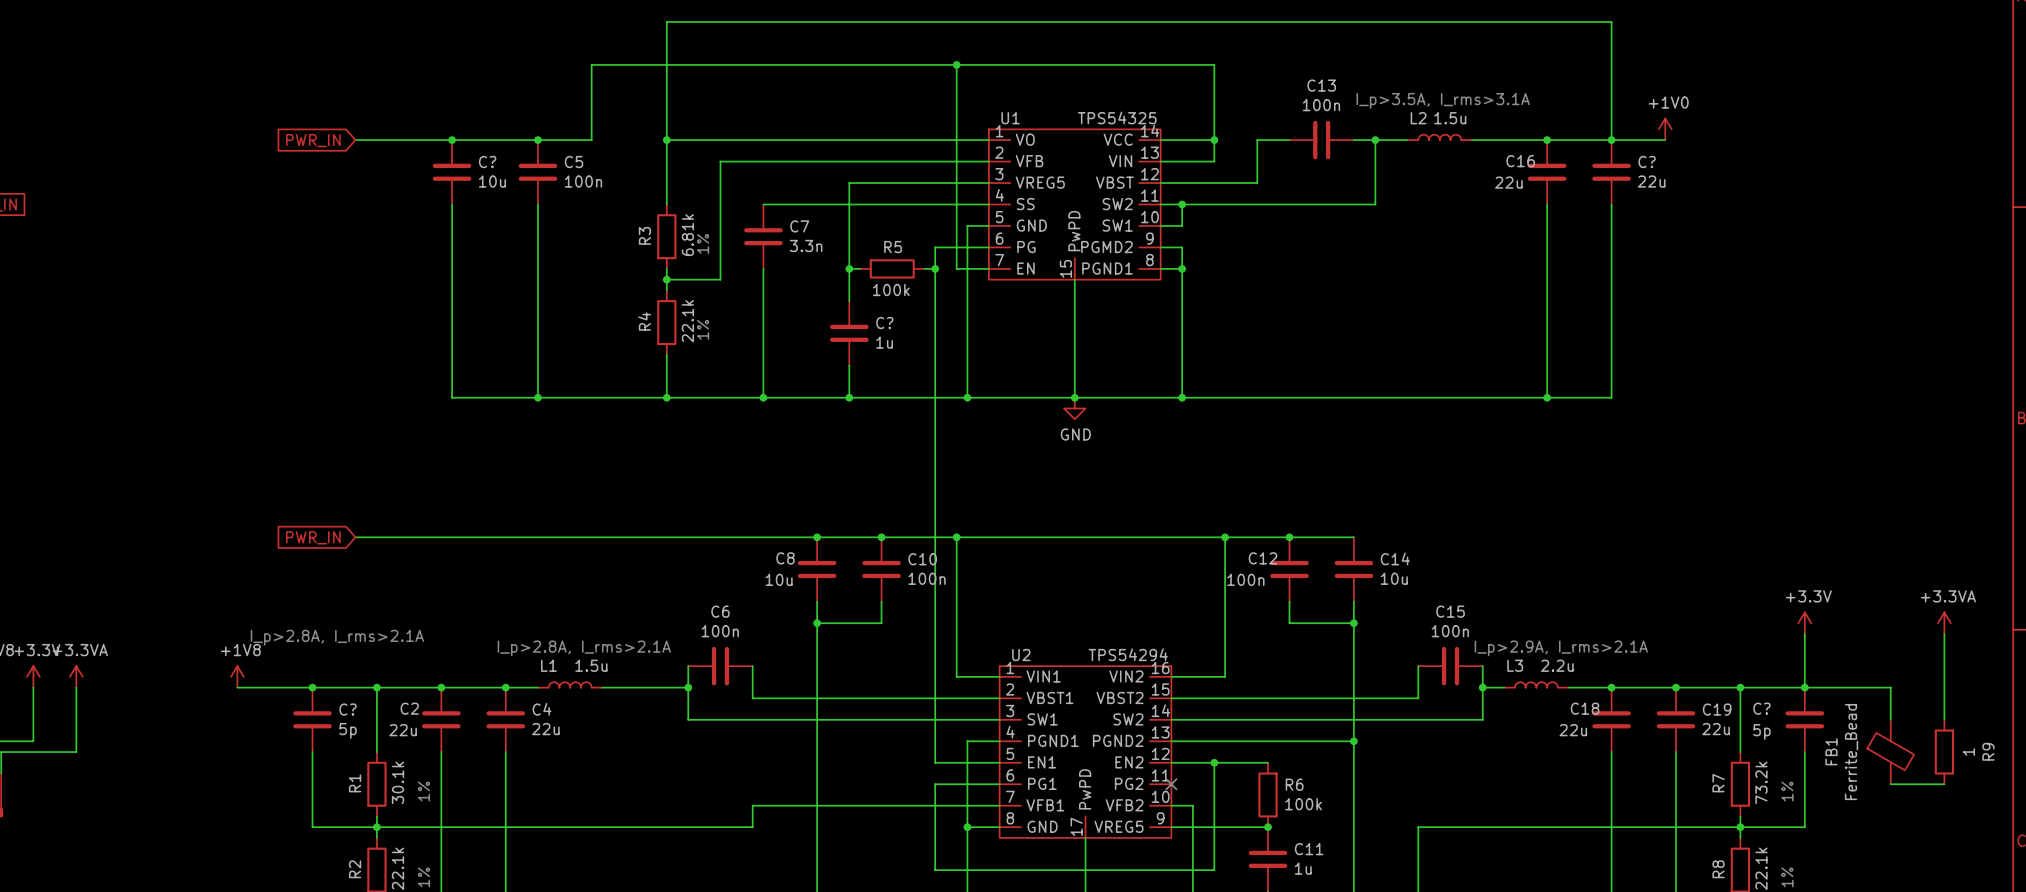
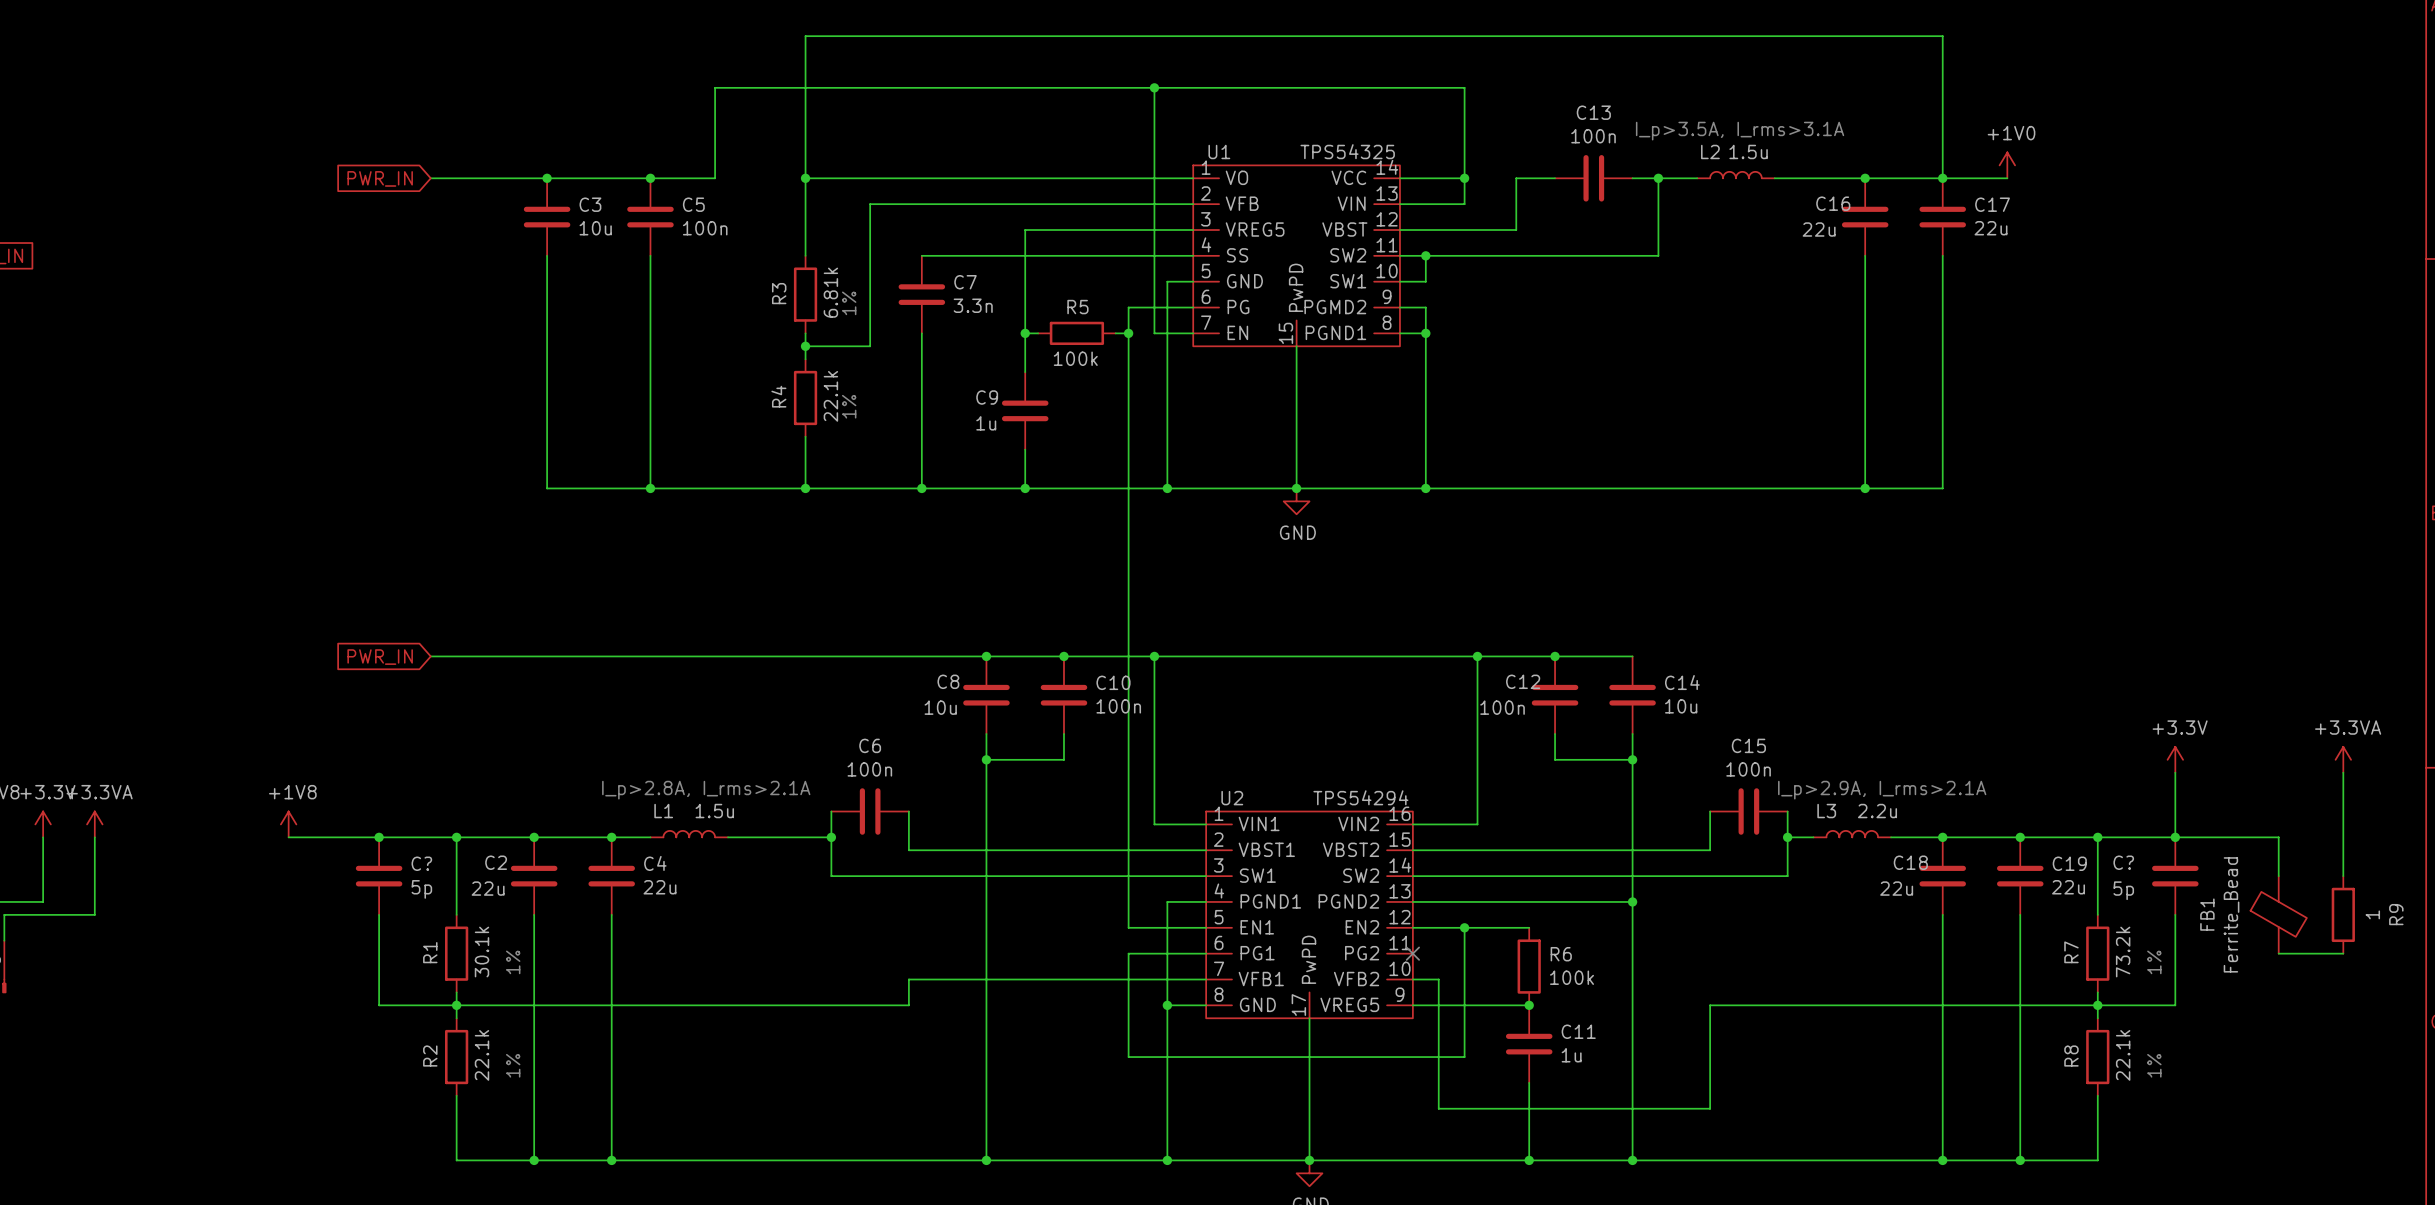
C? name: C? (487, 162) -> C3 (590, 204)
C? name: C? (1647, 162) -> C17 (1992, 204)
C? name: C? (884, 323) -> C9 (987, 397)
C? value position: 1u (884, 342) -> 1u (986, 423)
text: I_p>2.8A, I_rms>2.1A (337, 637) -> none

